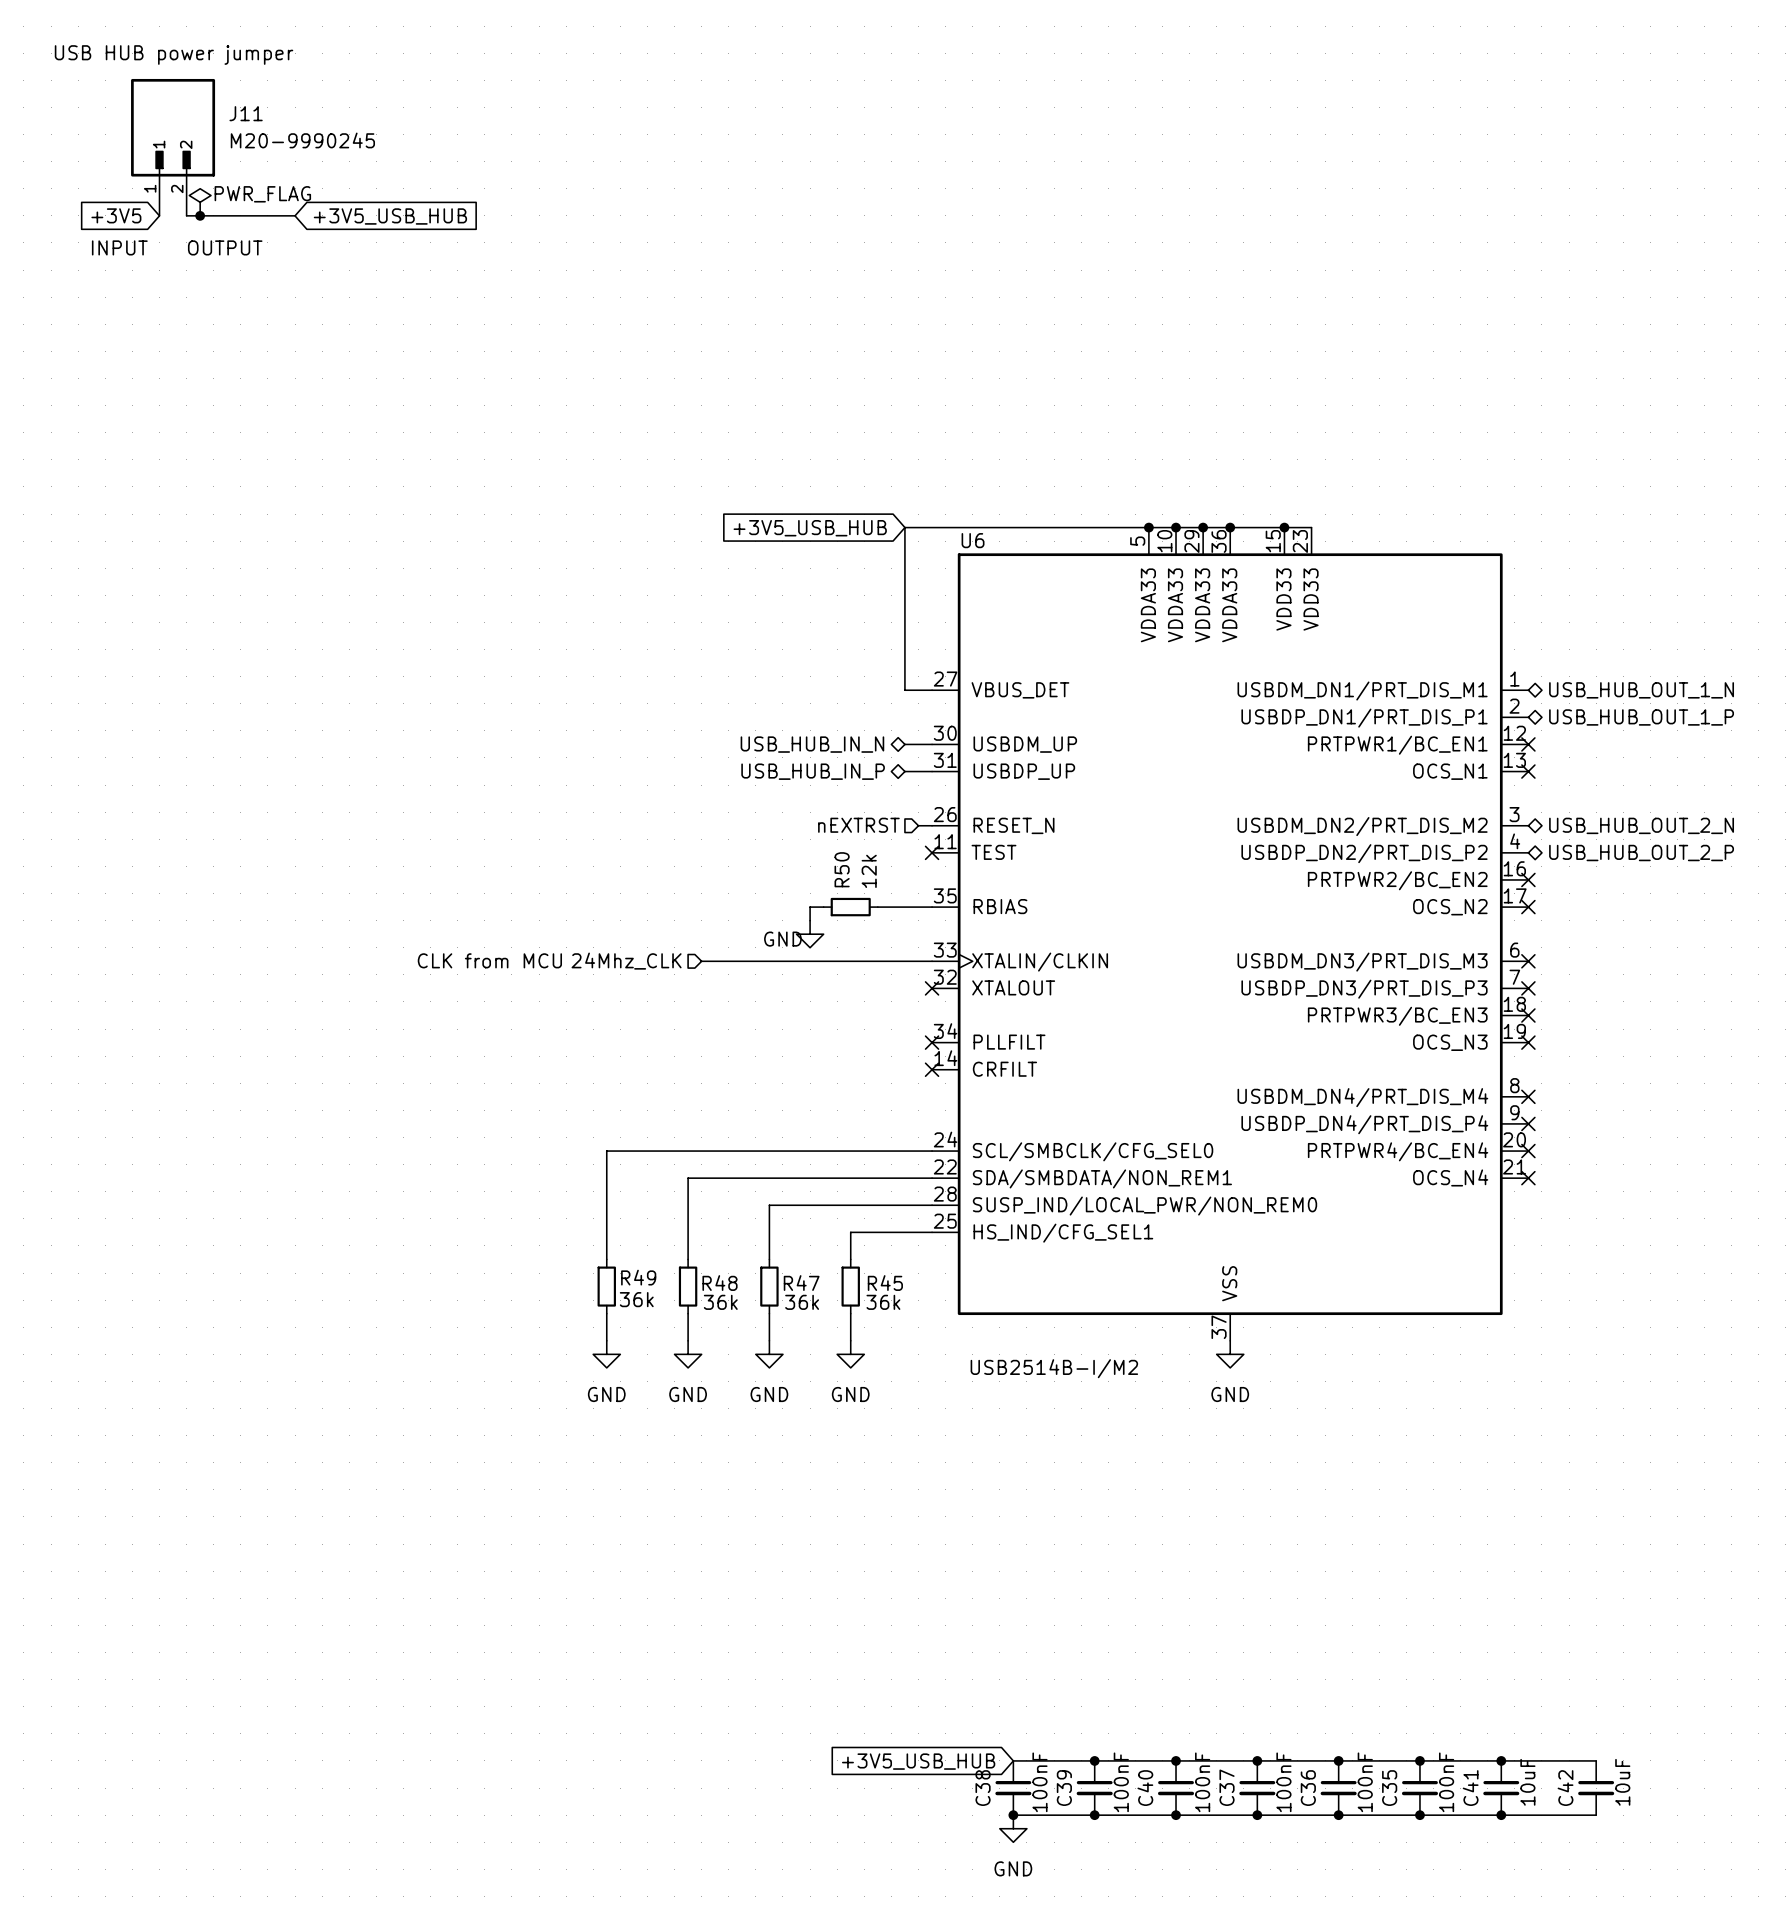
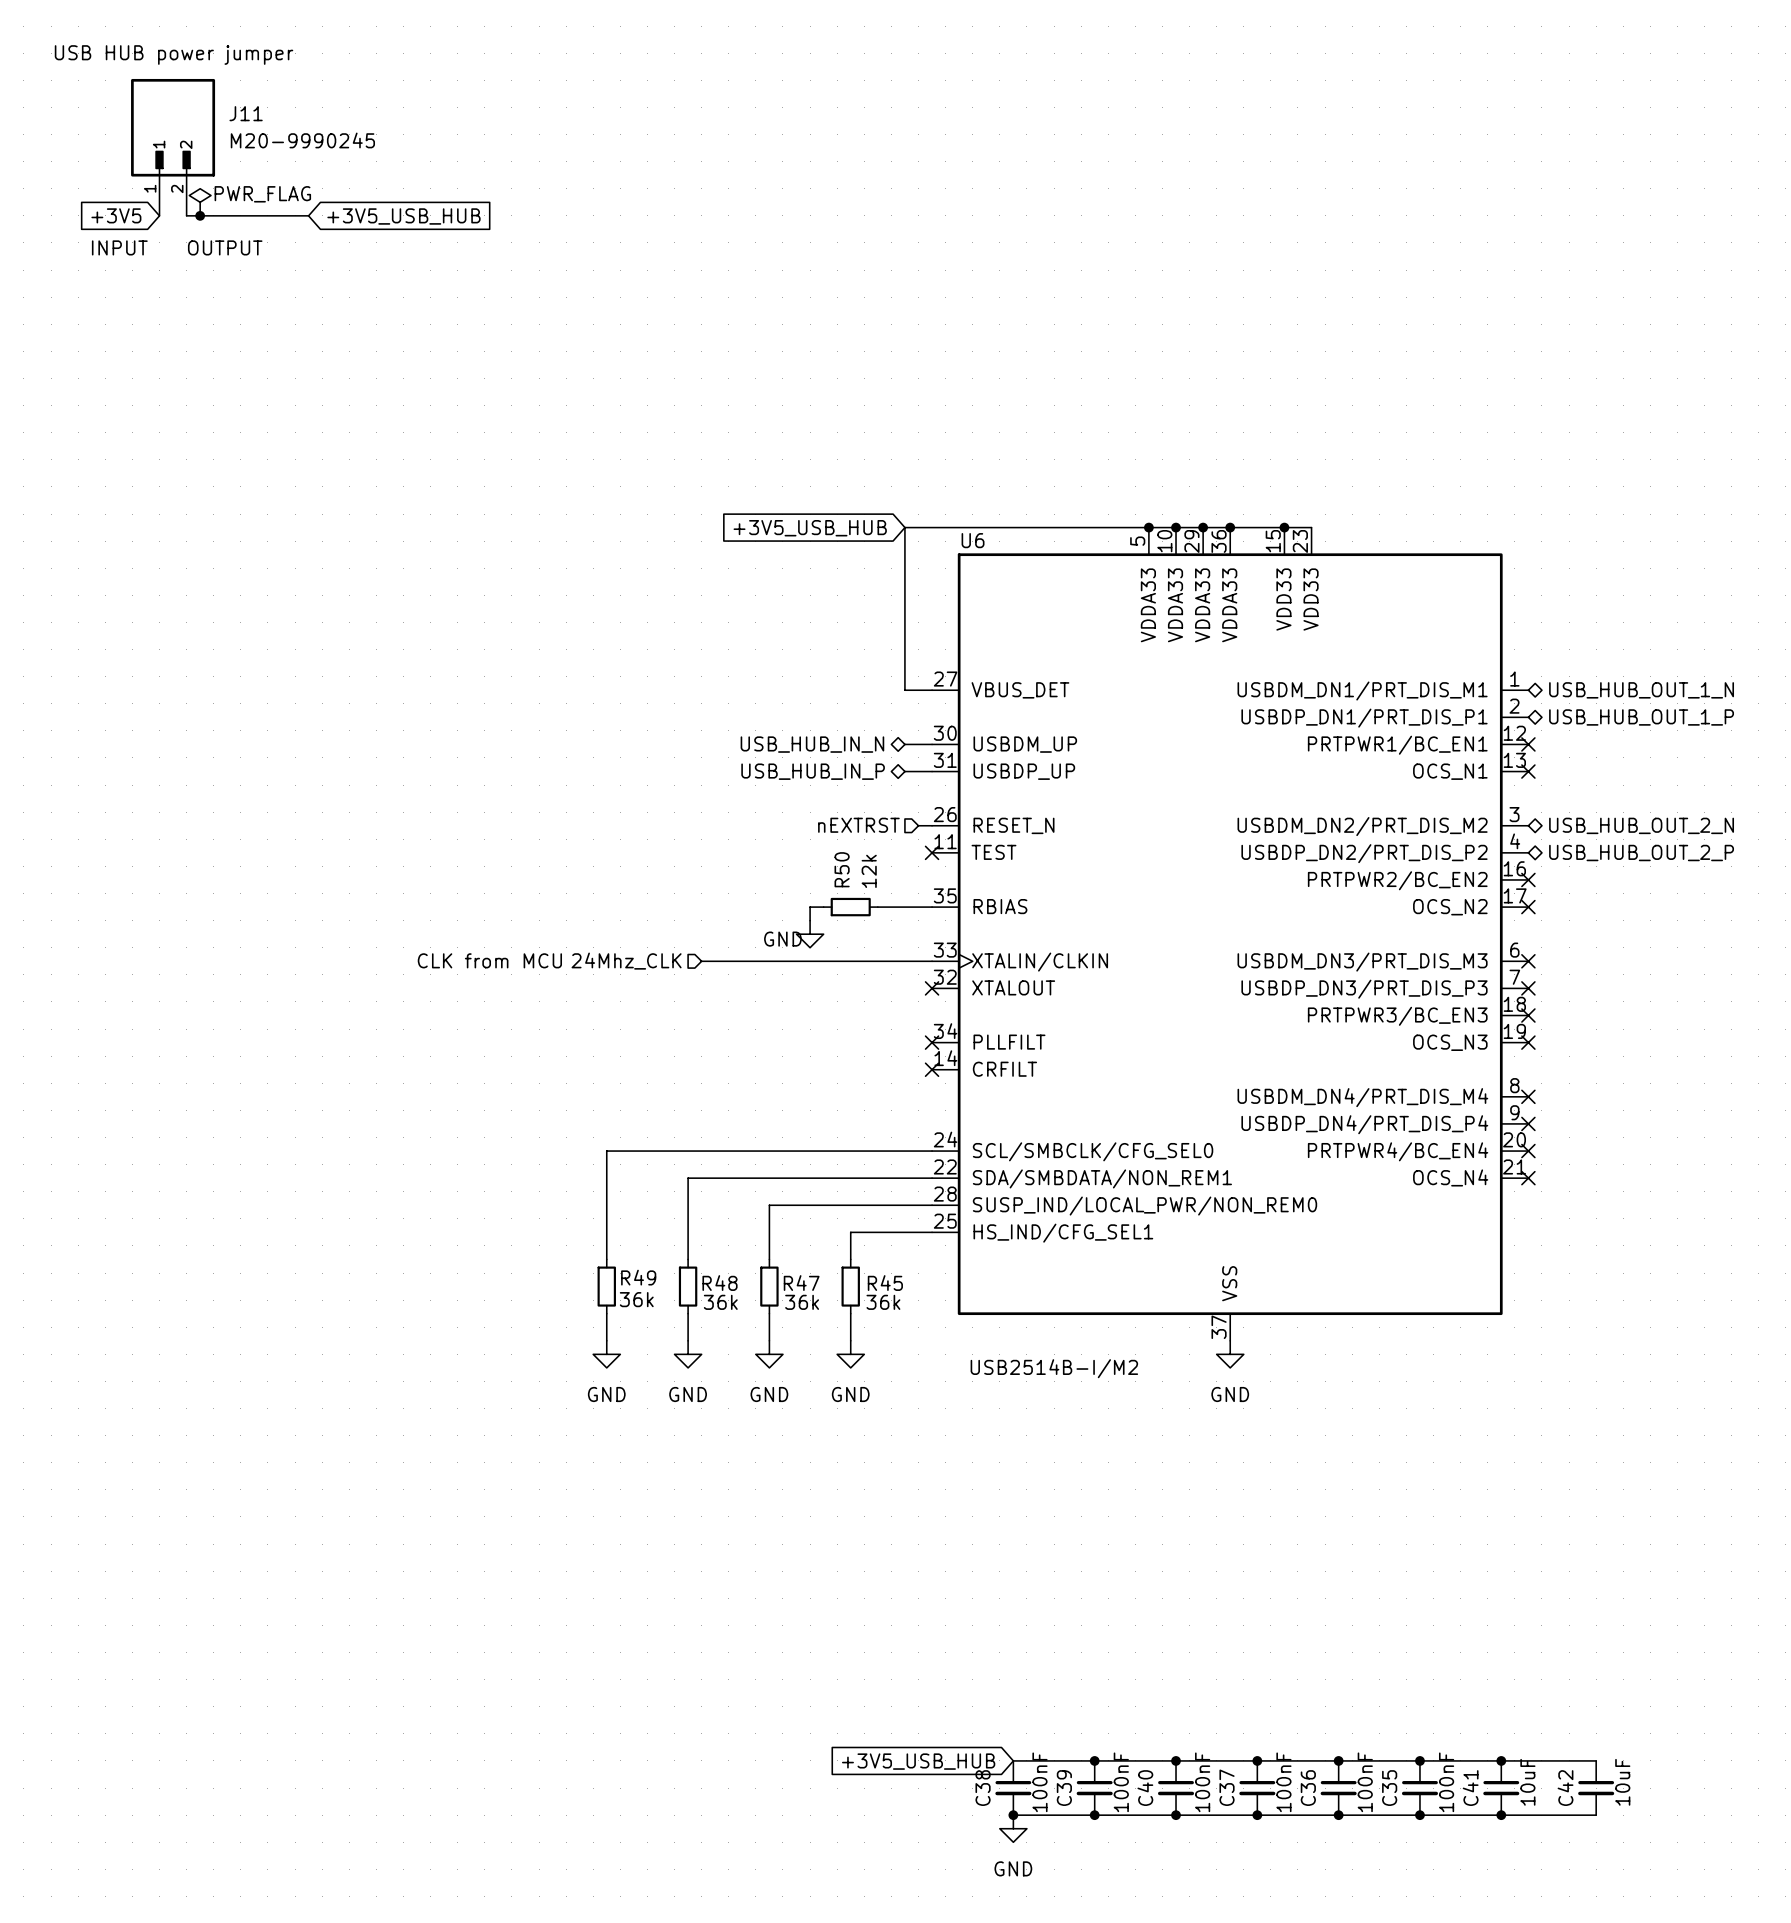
wire: none -> (295, 215) (308, 215)
global label position: +3V5_USB_HUB (390, 216) -> +3V5_USB_HUB (403, 216)

